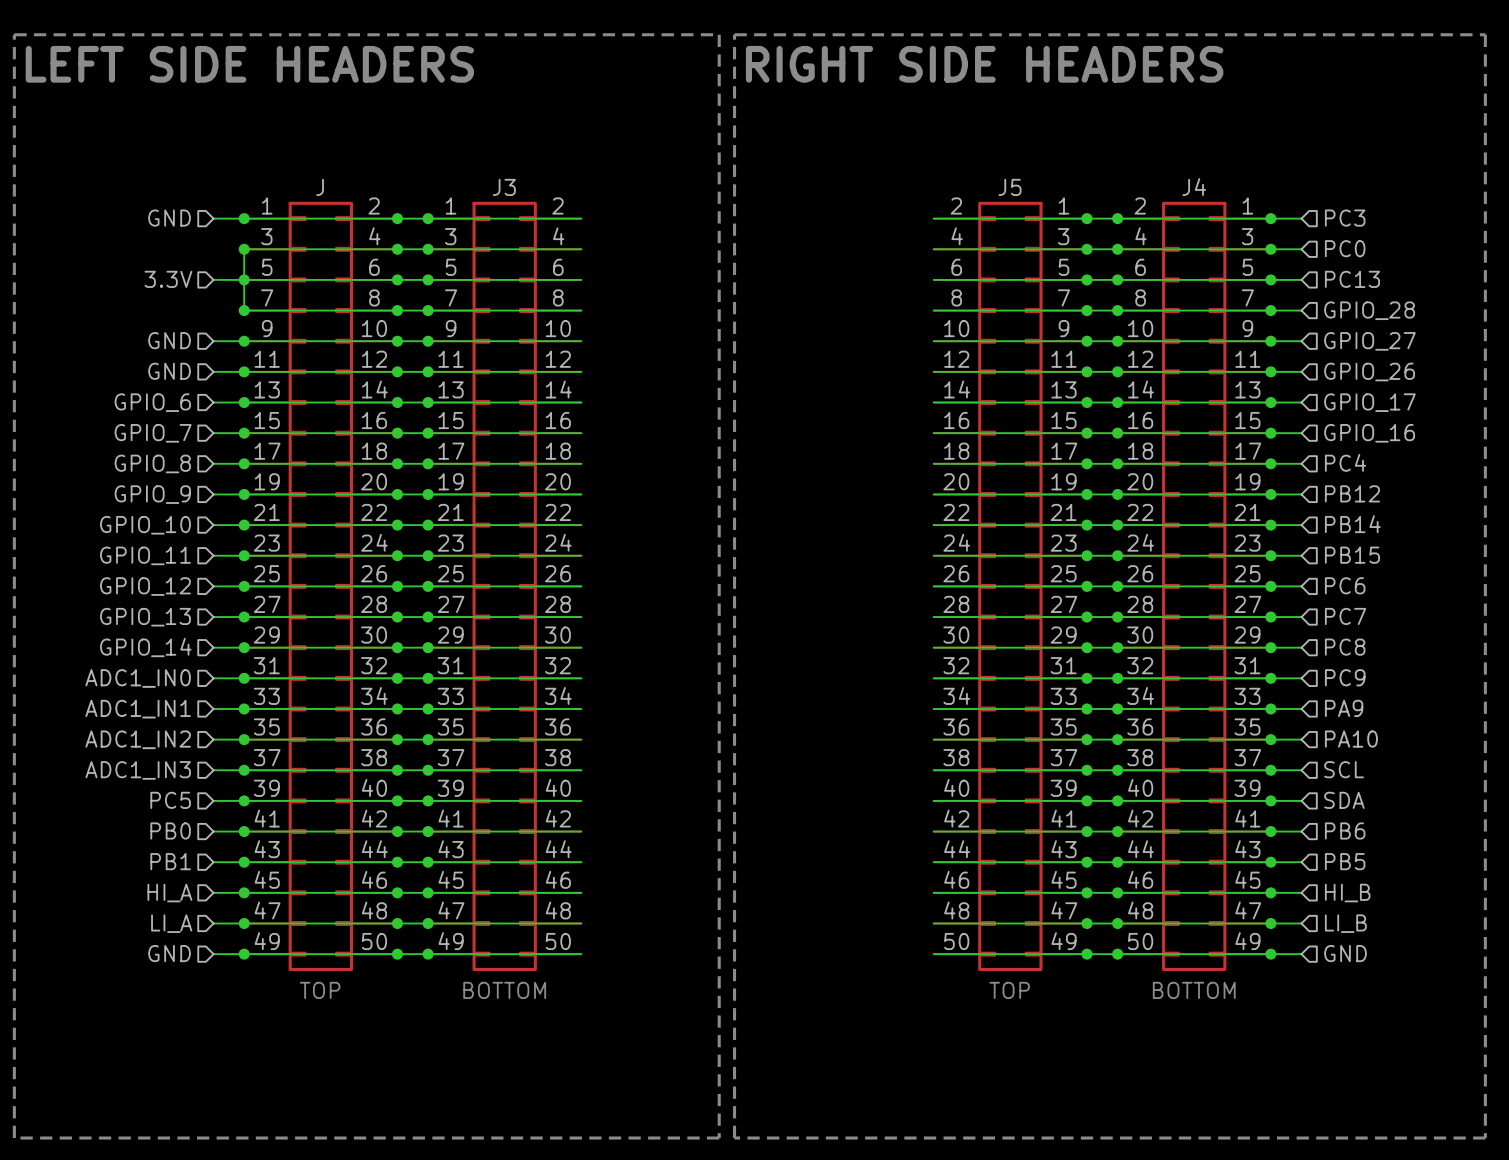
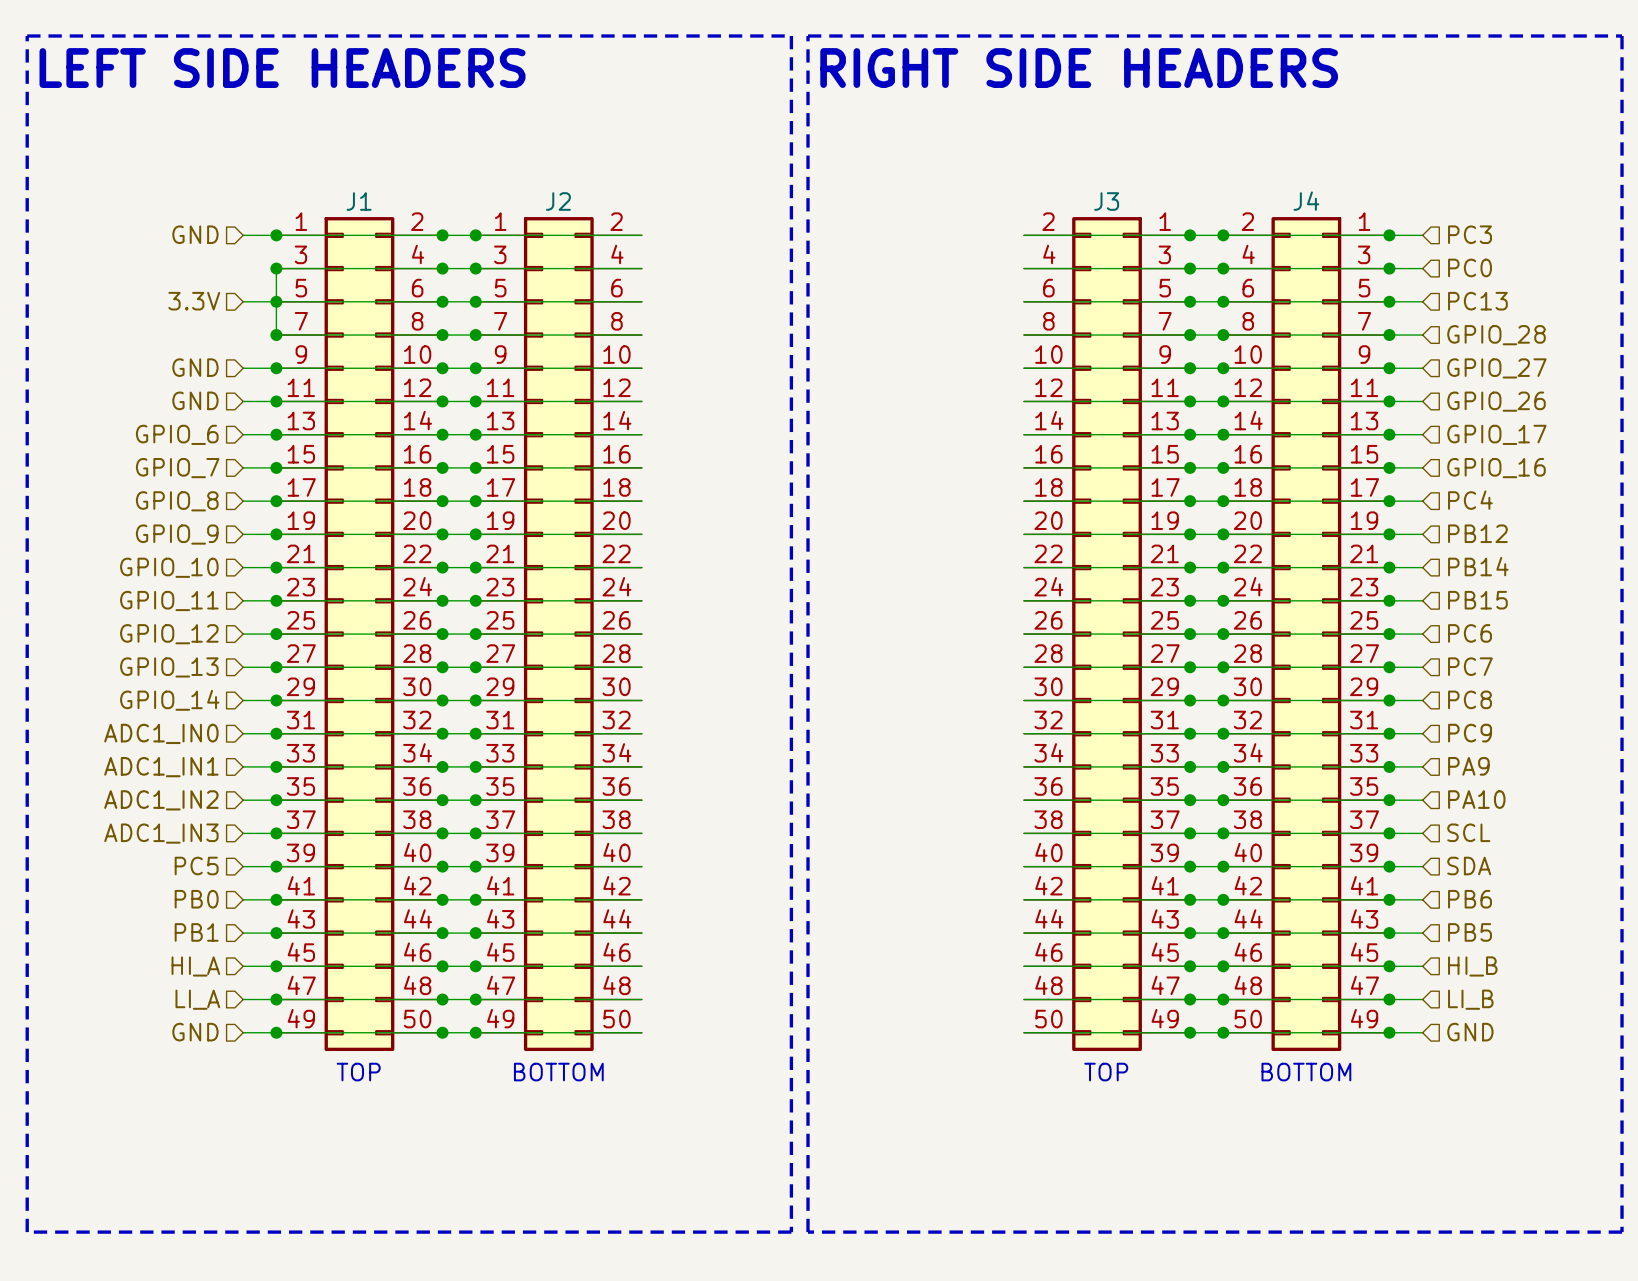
J name: J (320, 187) -> J1 (359, 201)
J3 name: J3 (504, 187) -> J2 (558, 201)
J5 name: J5 (1009, 187) -> J3 (1106, 201)

